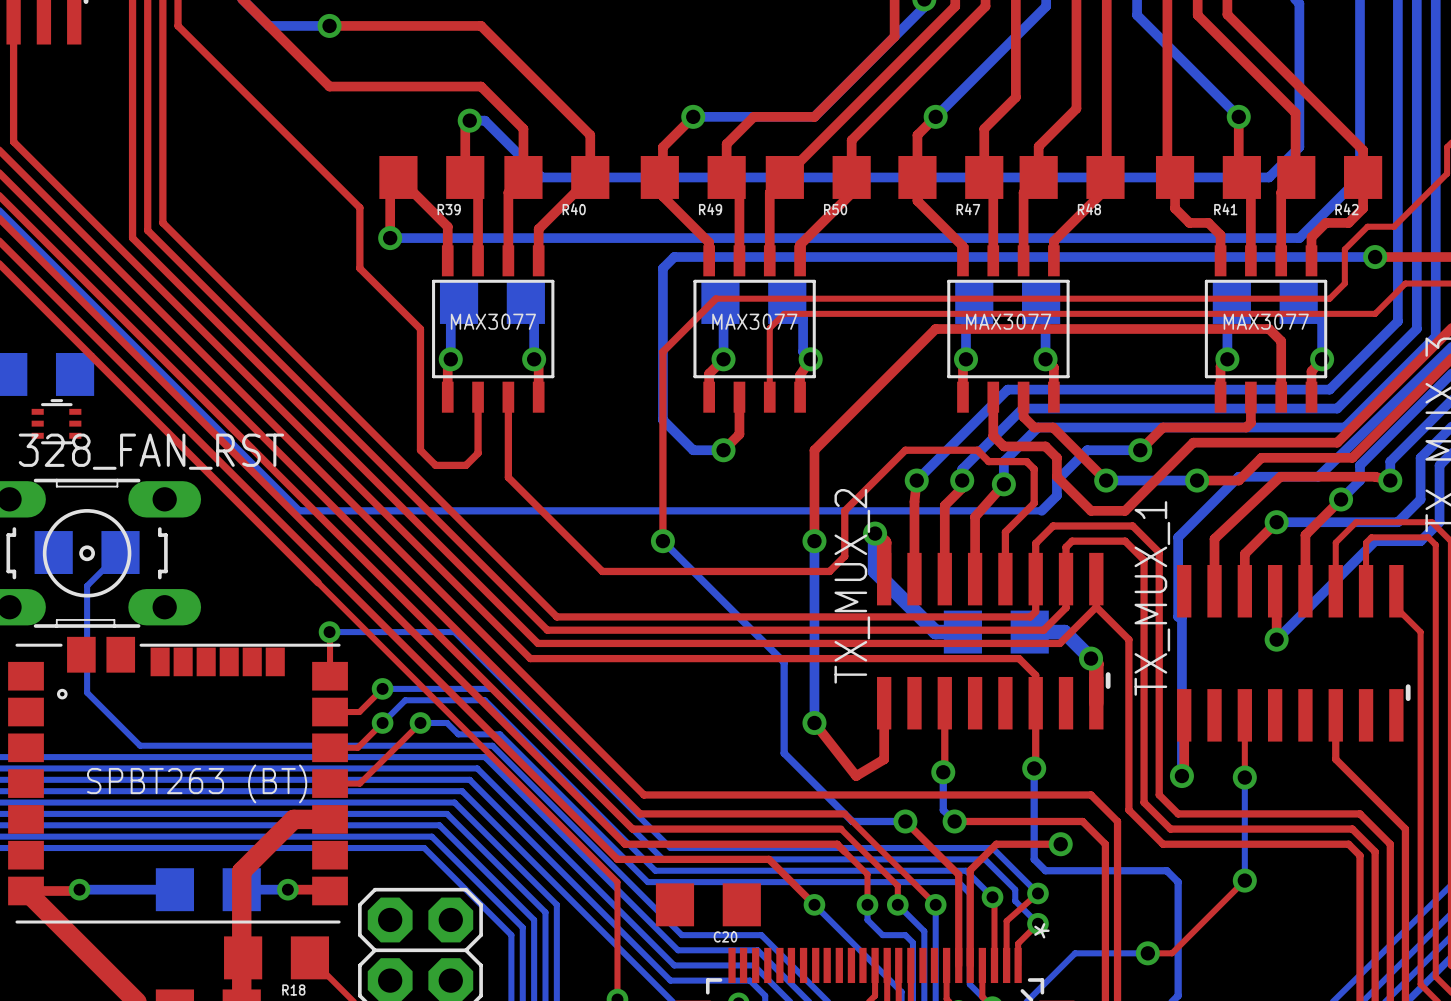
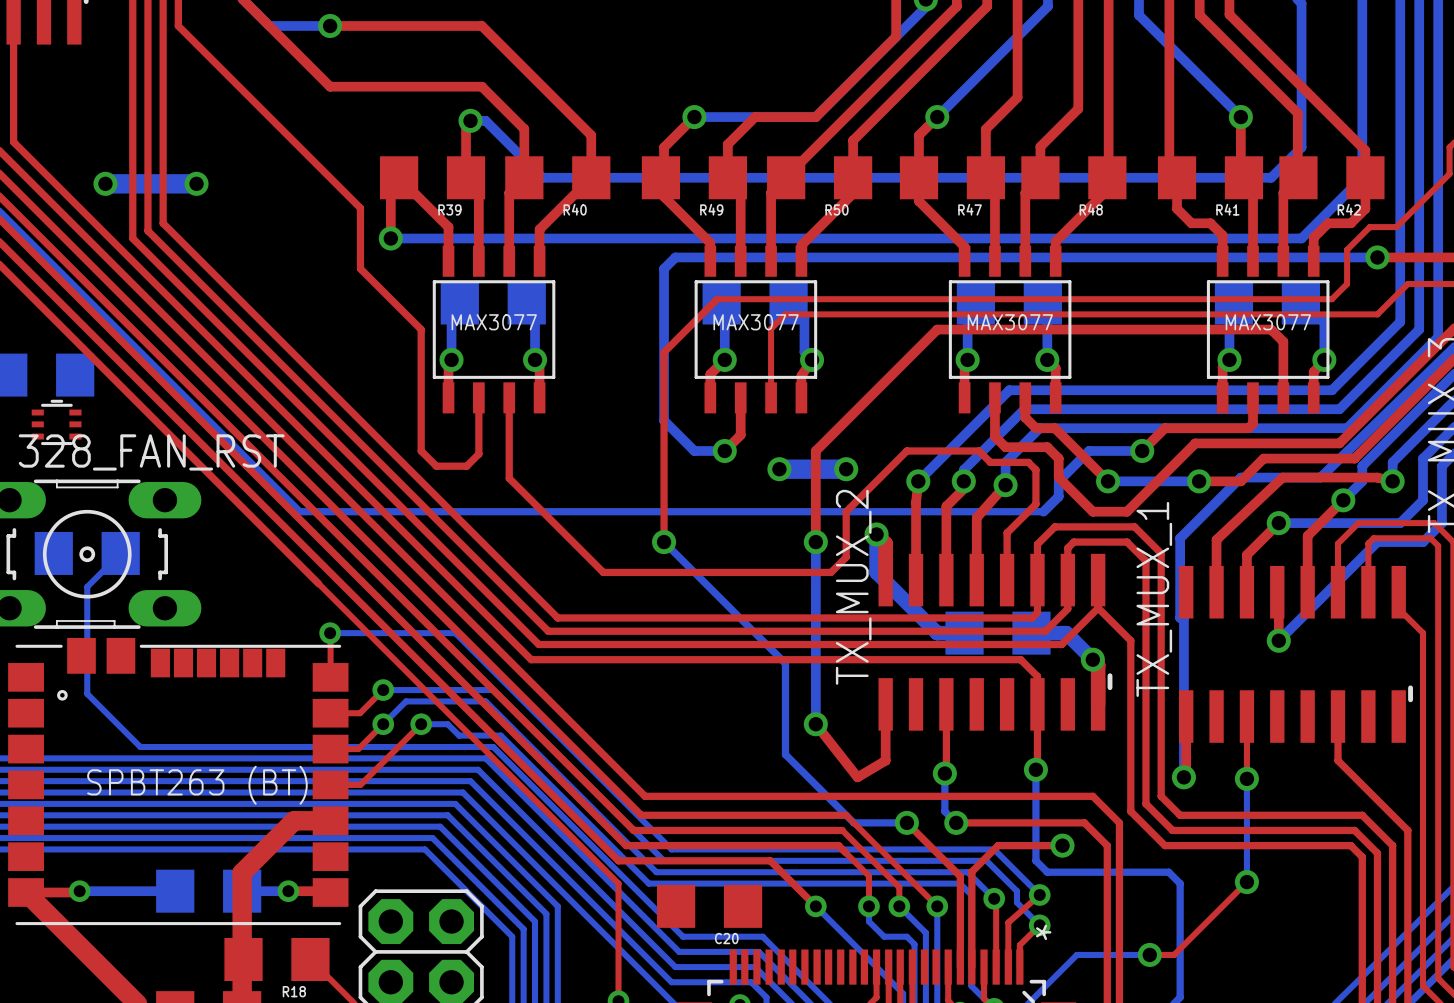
bottom track: none -> (105, 183) (196, 183)
via: none -> (105, 183)
via: none -> (196, 183)
bottom track: none -> (779, 469) (846, 469)
via: none -> (779, 469)
via: none -> (846, 469)

